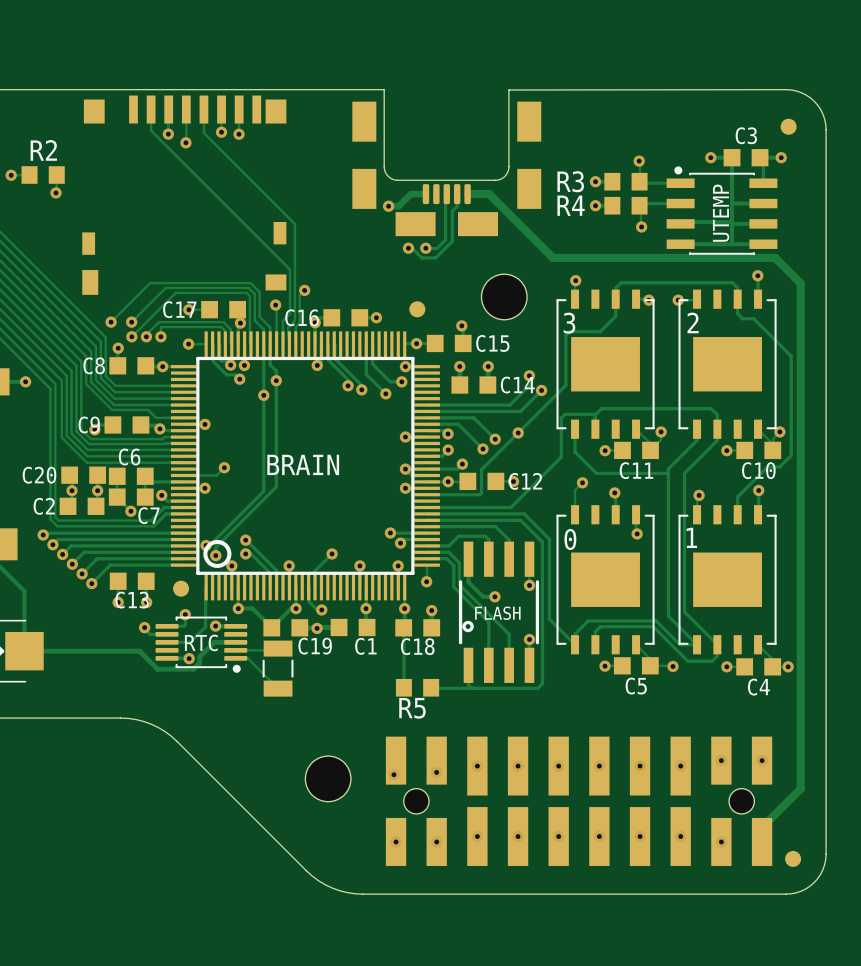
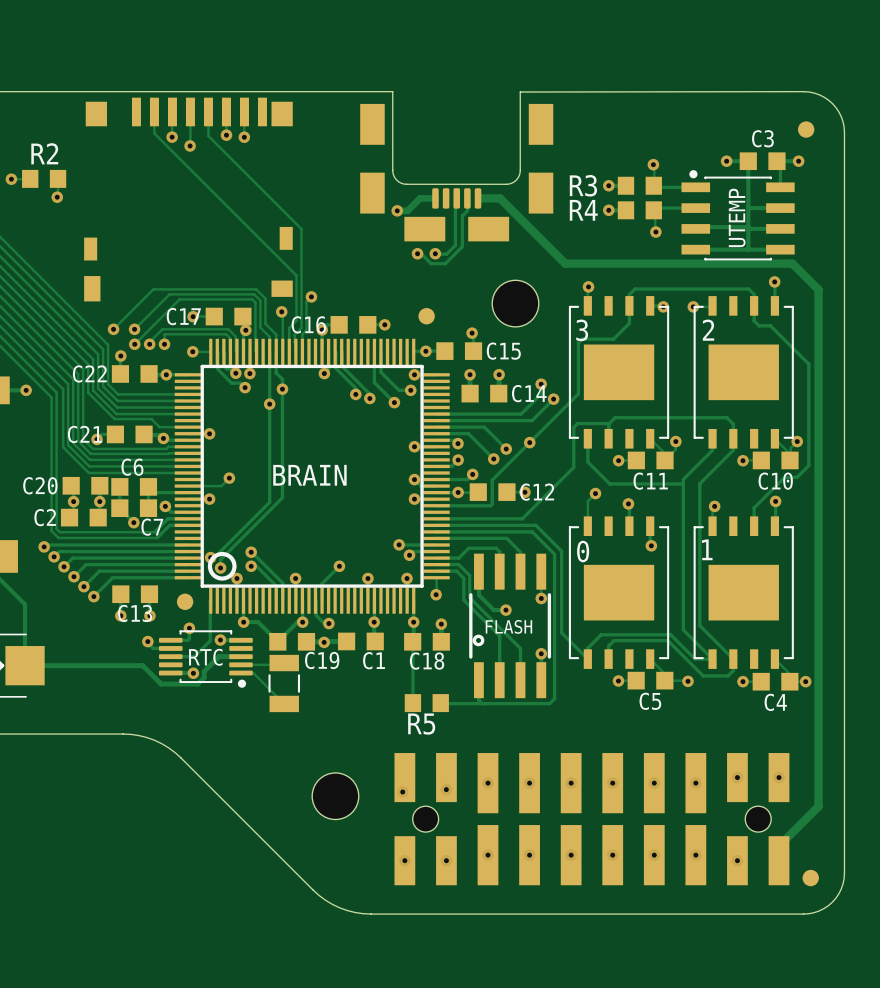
C8 name: C8 (94, 365) -> C22 (89, 373)
C9 name: C9 (89, 424) -> C21 (85, 434)

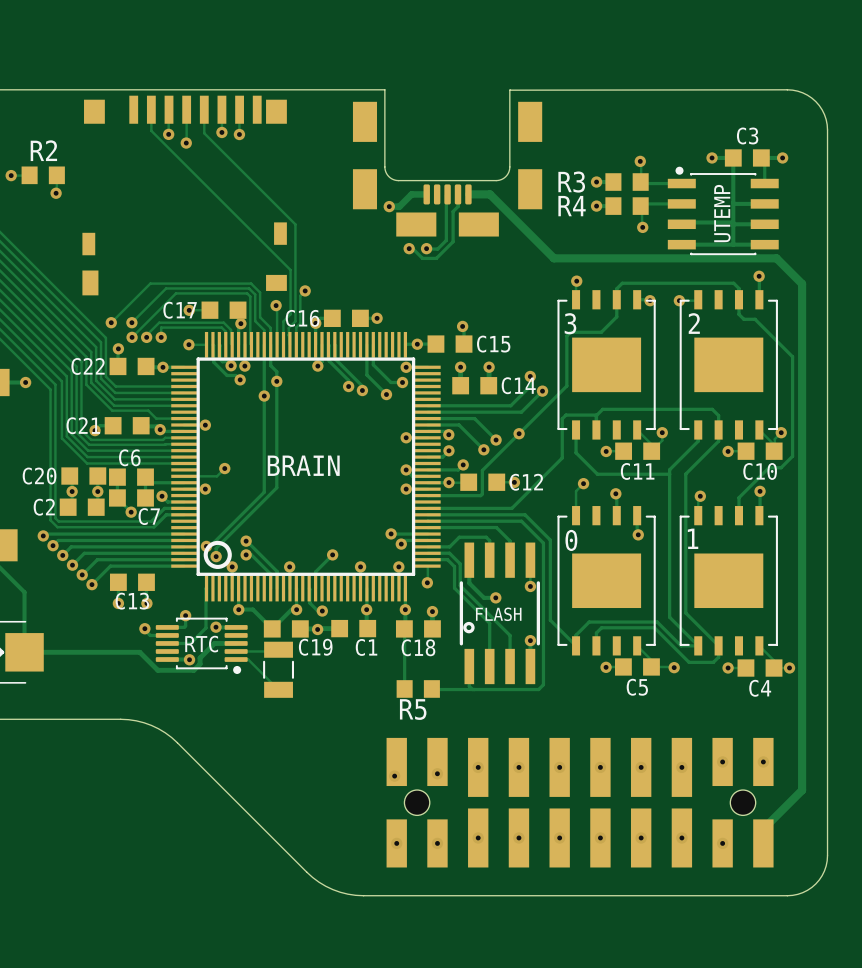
part: (806, 129) -> none
hole: (515, 303) -> none
part: (426, 316) -> none
part: (185, 601) -> none
hole: (335, 796) -> none
part: (810, 878) -> none

